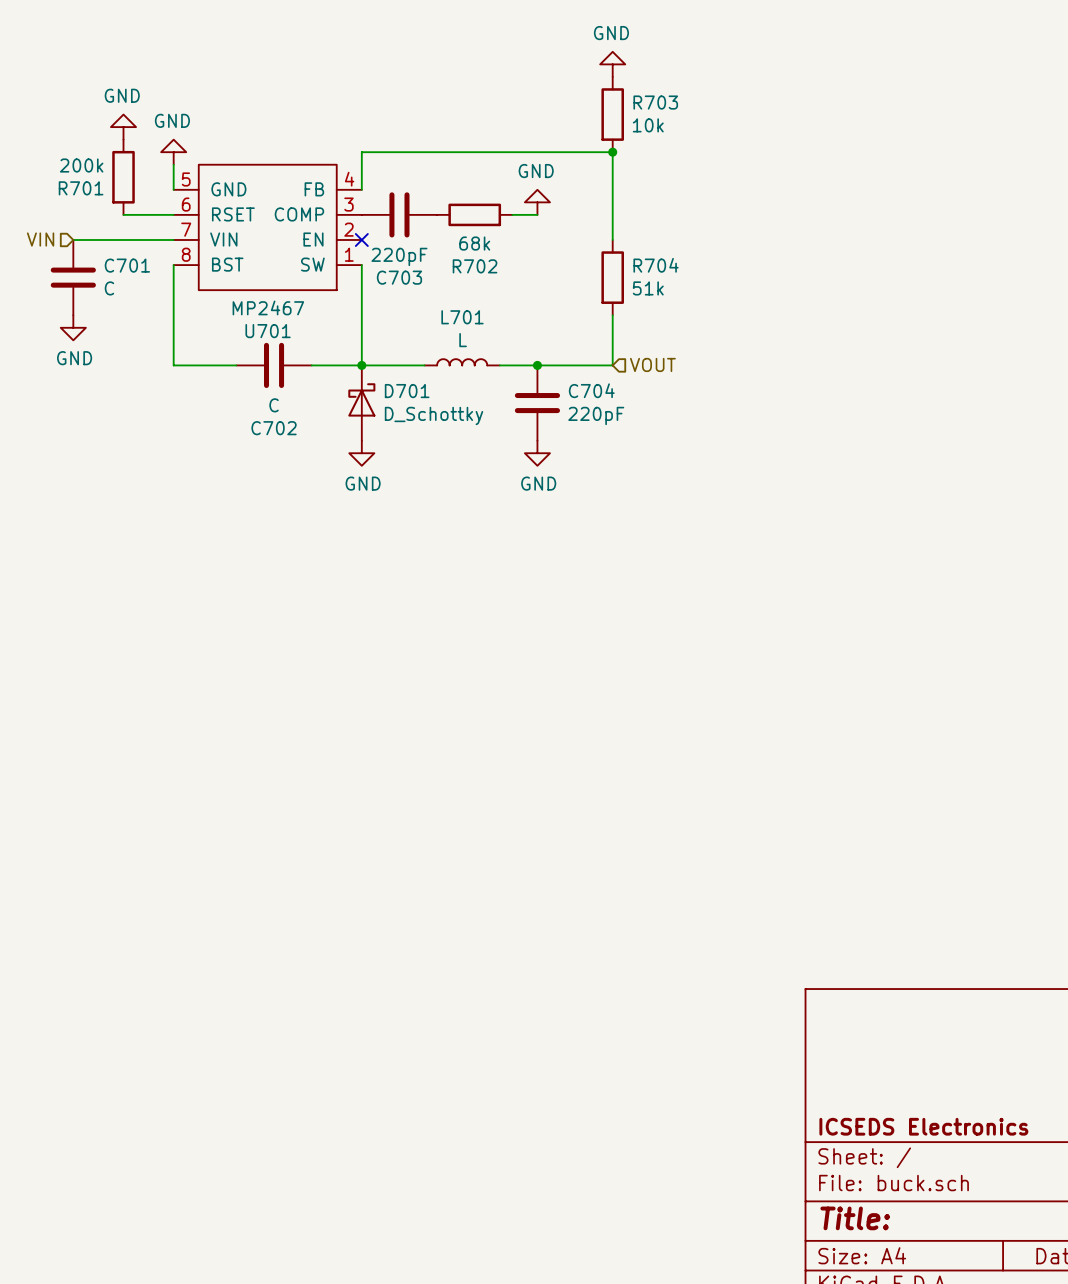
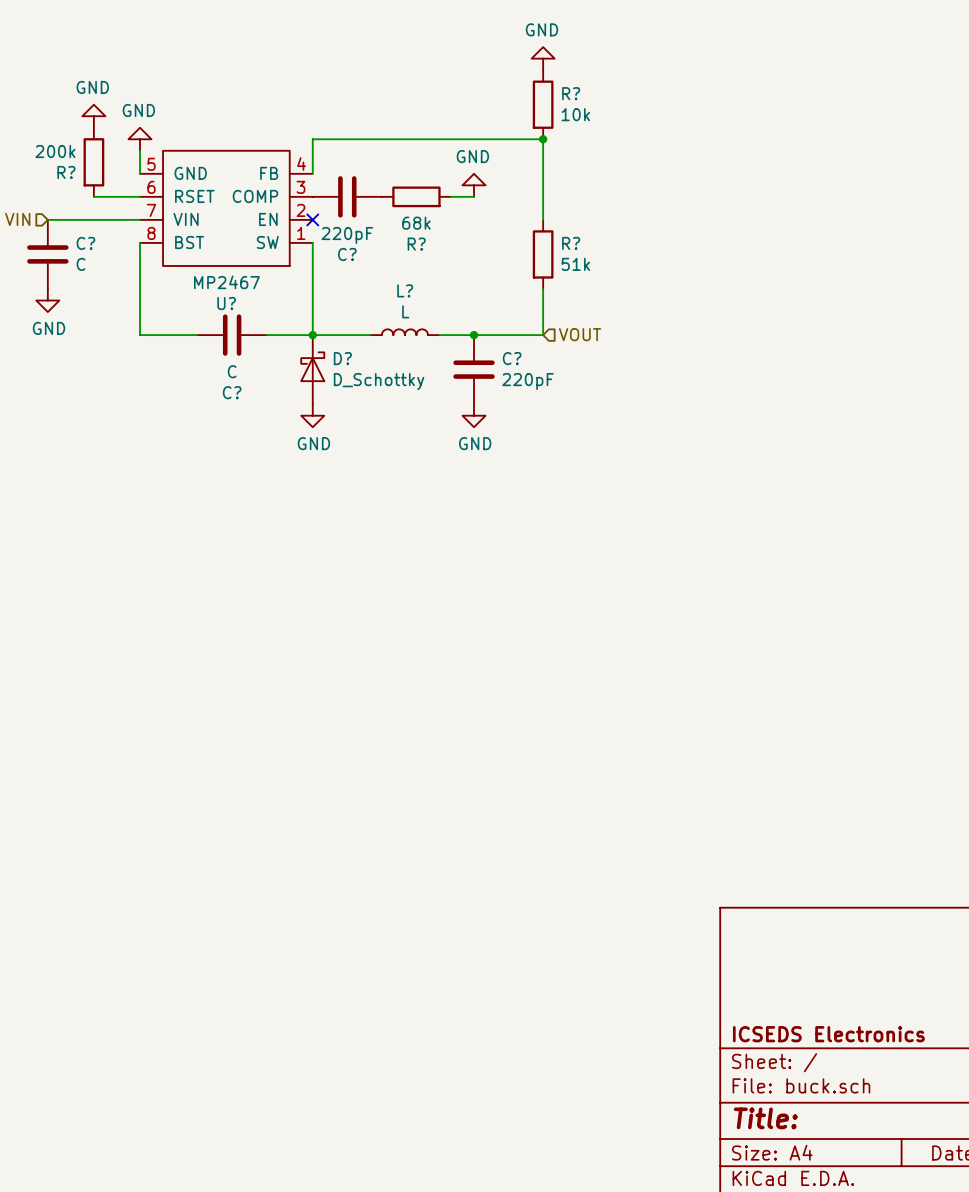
R703 name: R703 (655, 102) -> R? (571, 93)
R701 name: R701 (81, 188) -> R? (66, 172)
C701 name: C701 (127, 265) -> C? (85, 243)
R704 name: R704 (656, 265) -> R? (571, 243)
R702 name: R702 (475, 266) -> R? (416, 244)
C703 name: C703 (399, 277) -> C? (347, 254)
L701 name: L701 (462, 317) -> L? (405, 290)
U701 name: U701 (268, 331) -> U? (226, 303)
C704 name: C704 (591, 390) -> C? (512, 358)
D701 name: D701 (407, 391) -> D? (342, 358)
C702 name: C702 (274, 428) -> C? (232, 392)

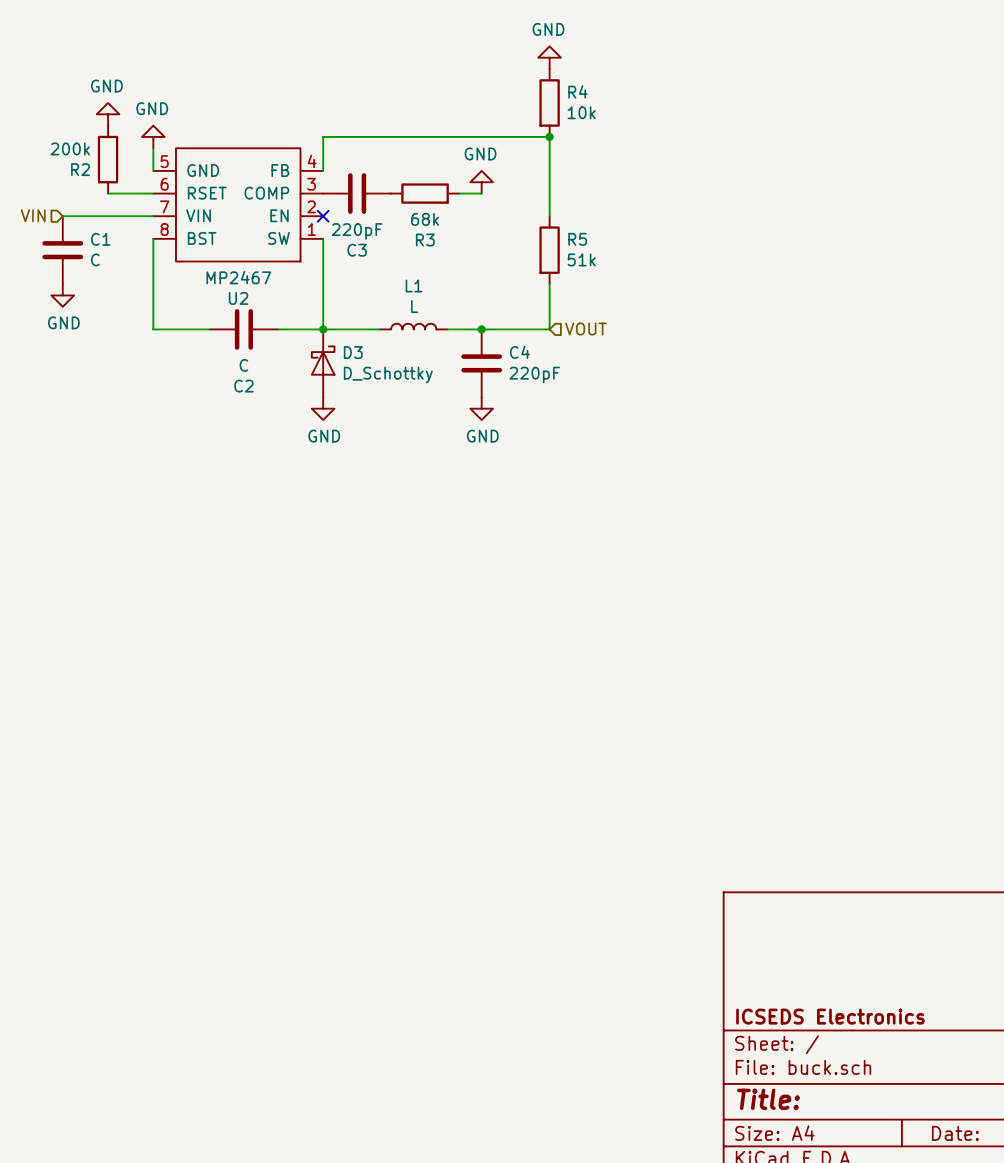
R? name: R? (571, 93) -> R4 (577, 91)
R? name: R? (66, 172) -> R2 (80, 169)
C? name: C? (85, 243) -> C1 (100, 239)
R? name: R? (571, 243) -> R5 (577, 239)
R? name: R? (416, 244) -> R3 (425, 240)
C? name: C? (347, 254) -> C3 (357, 250)
L? name: L? (405, 290) -> L1 (414, 285)
U? name: U? (226, 303) -> U2 (238, 298)
D? name: D? (342, 358) -> D3 (353, 352)
C? name: C? (512, 358) -> C4 (519, 352)
C? name: C? (232, 392) -> C2 (243, 386)

